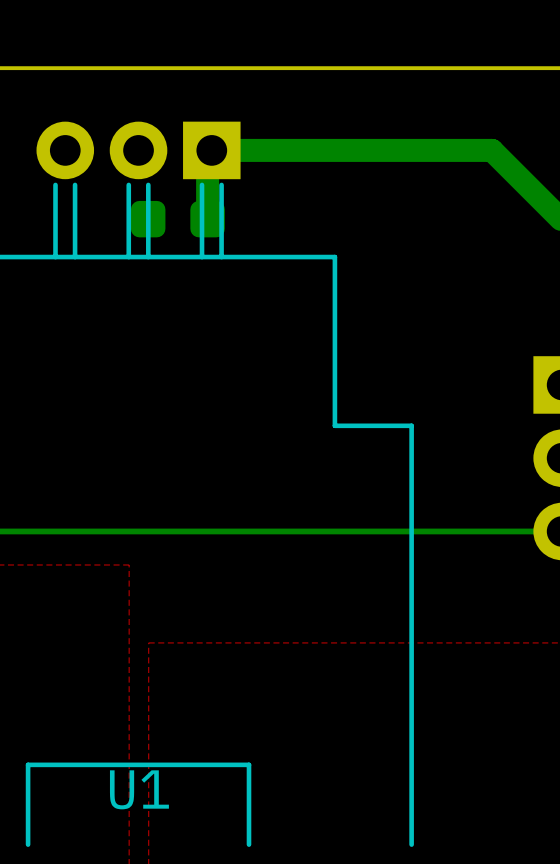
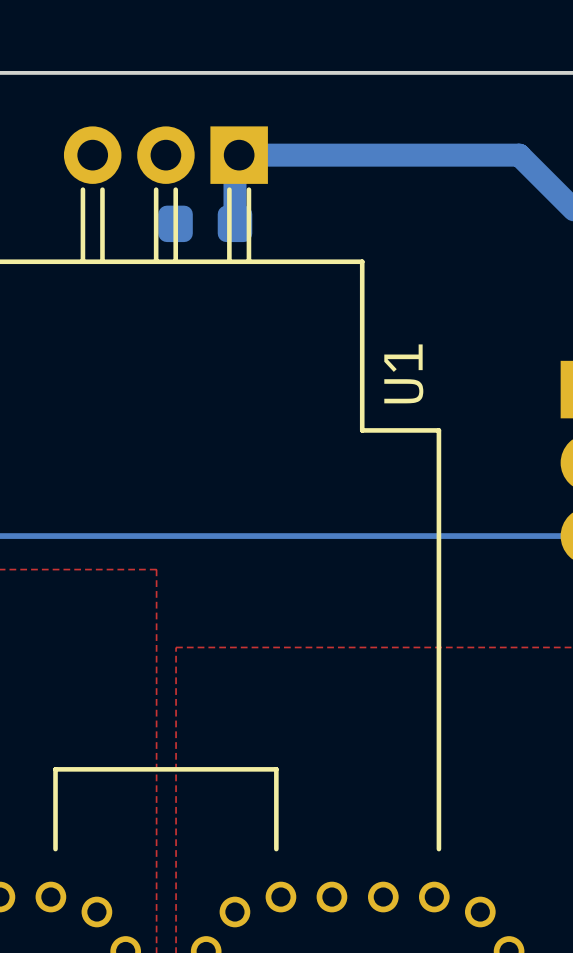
U1 name rotation: 0° (139, 789) -> 90° counterclockwise (403, 373)
U1 name position: U1 (139, 789) -> U1 (403, 373)

